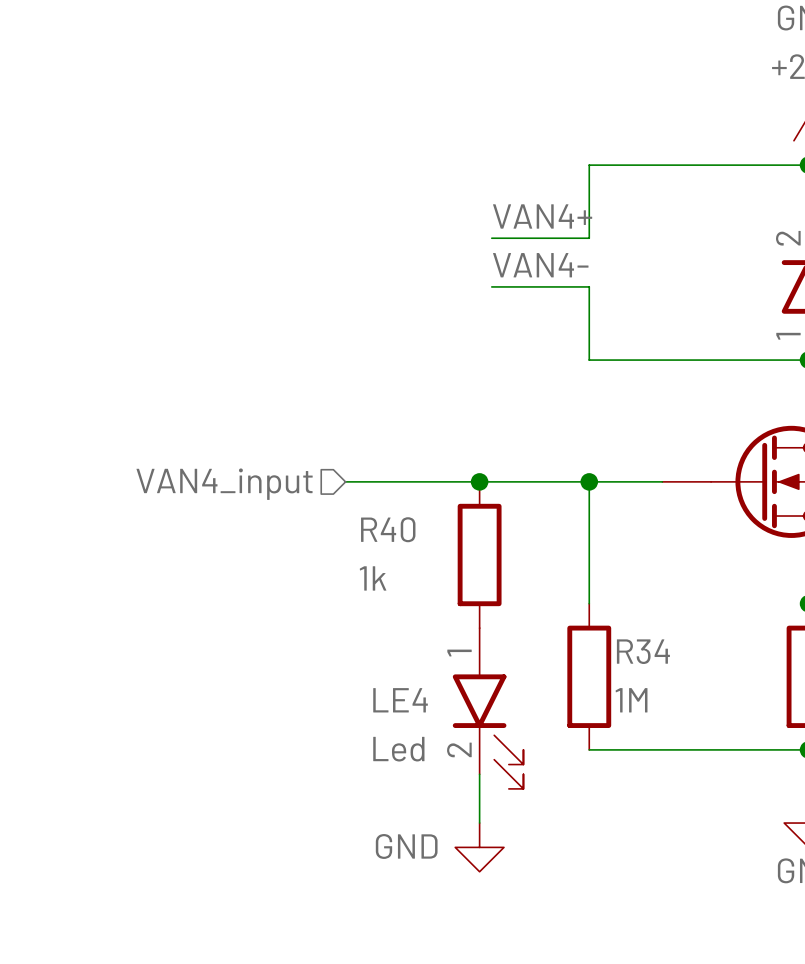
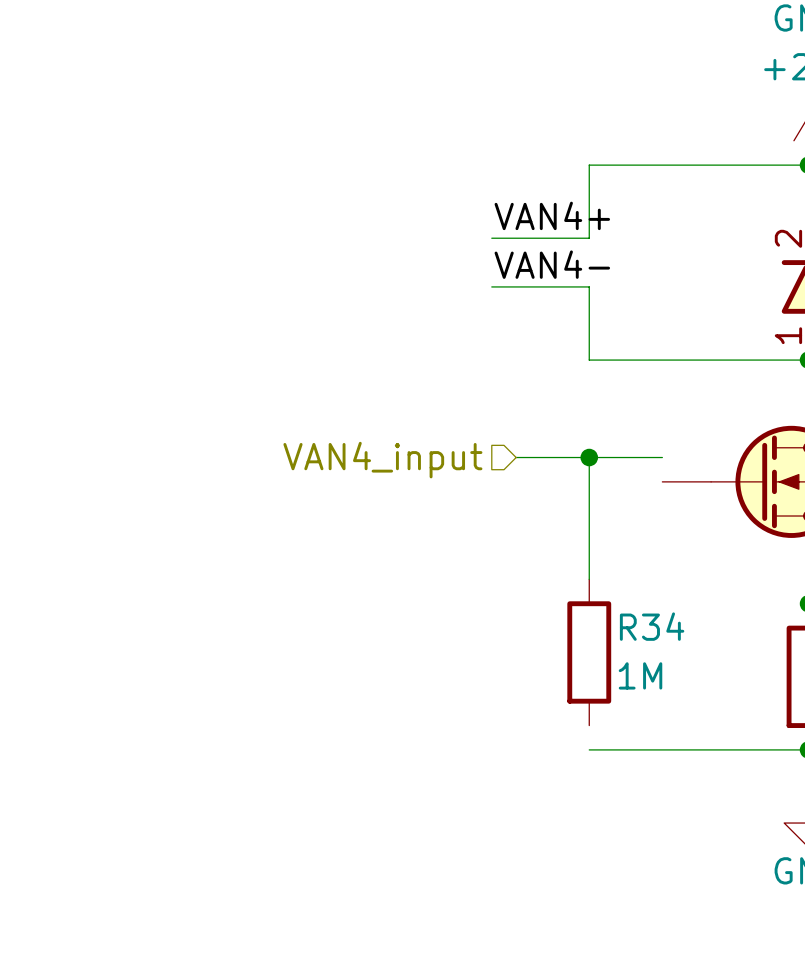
wire: none -> (516, 457) (662, 457)
wire: (345, 481) (662, 481) -> none
junction: (479, 481) -> none
junction position: (589, 481) -> (589, 457)
hierarchical label position: VAN4_input (224, 484) -> VAN4_input (382, 460)
R40: 1k (479, 554) -> none
R34 position: (589, 676) -> (589, 652)
LE4: Led (488, 708) -> none
wire: (479, 774) (479, 823) -> none
power symbol: GND (479, 847) -> none

